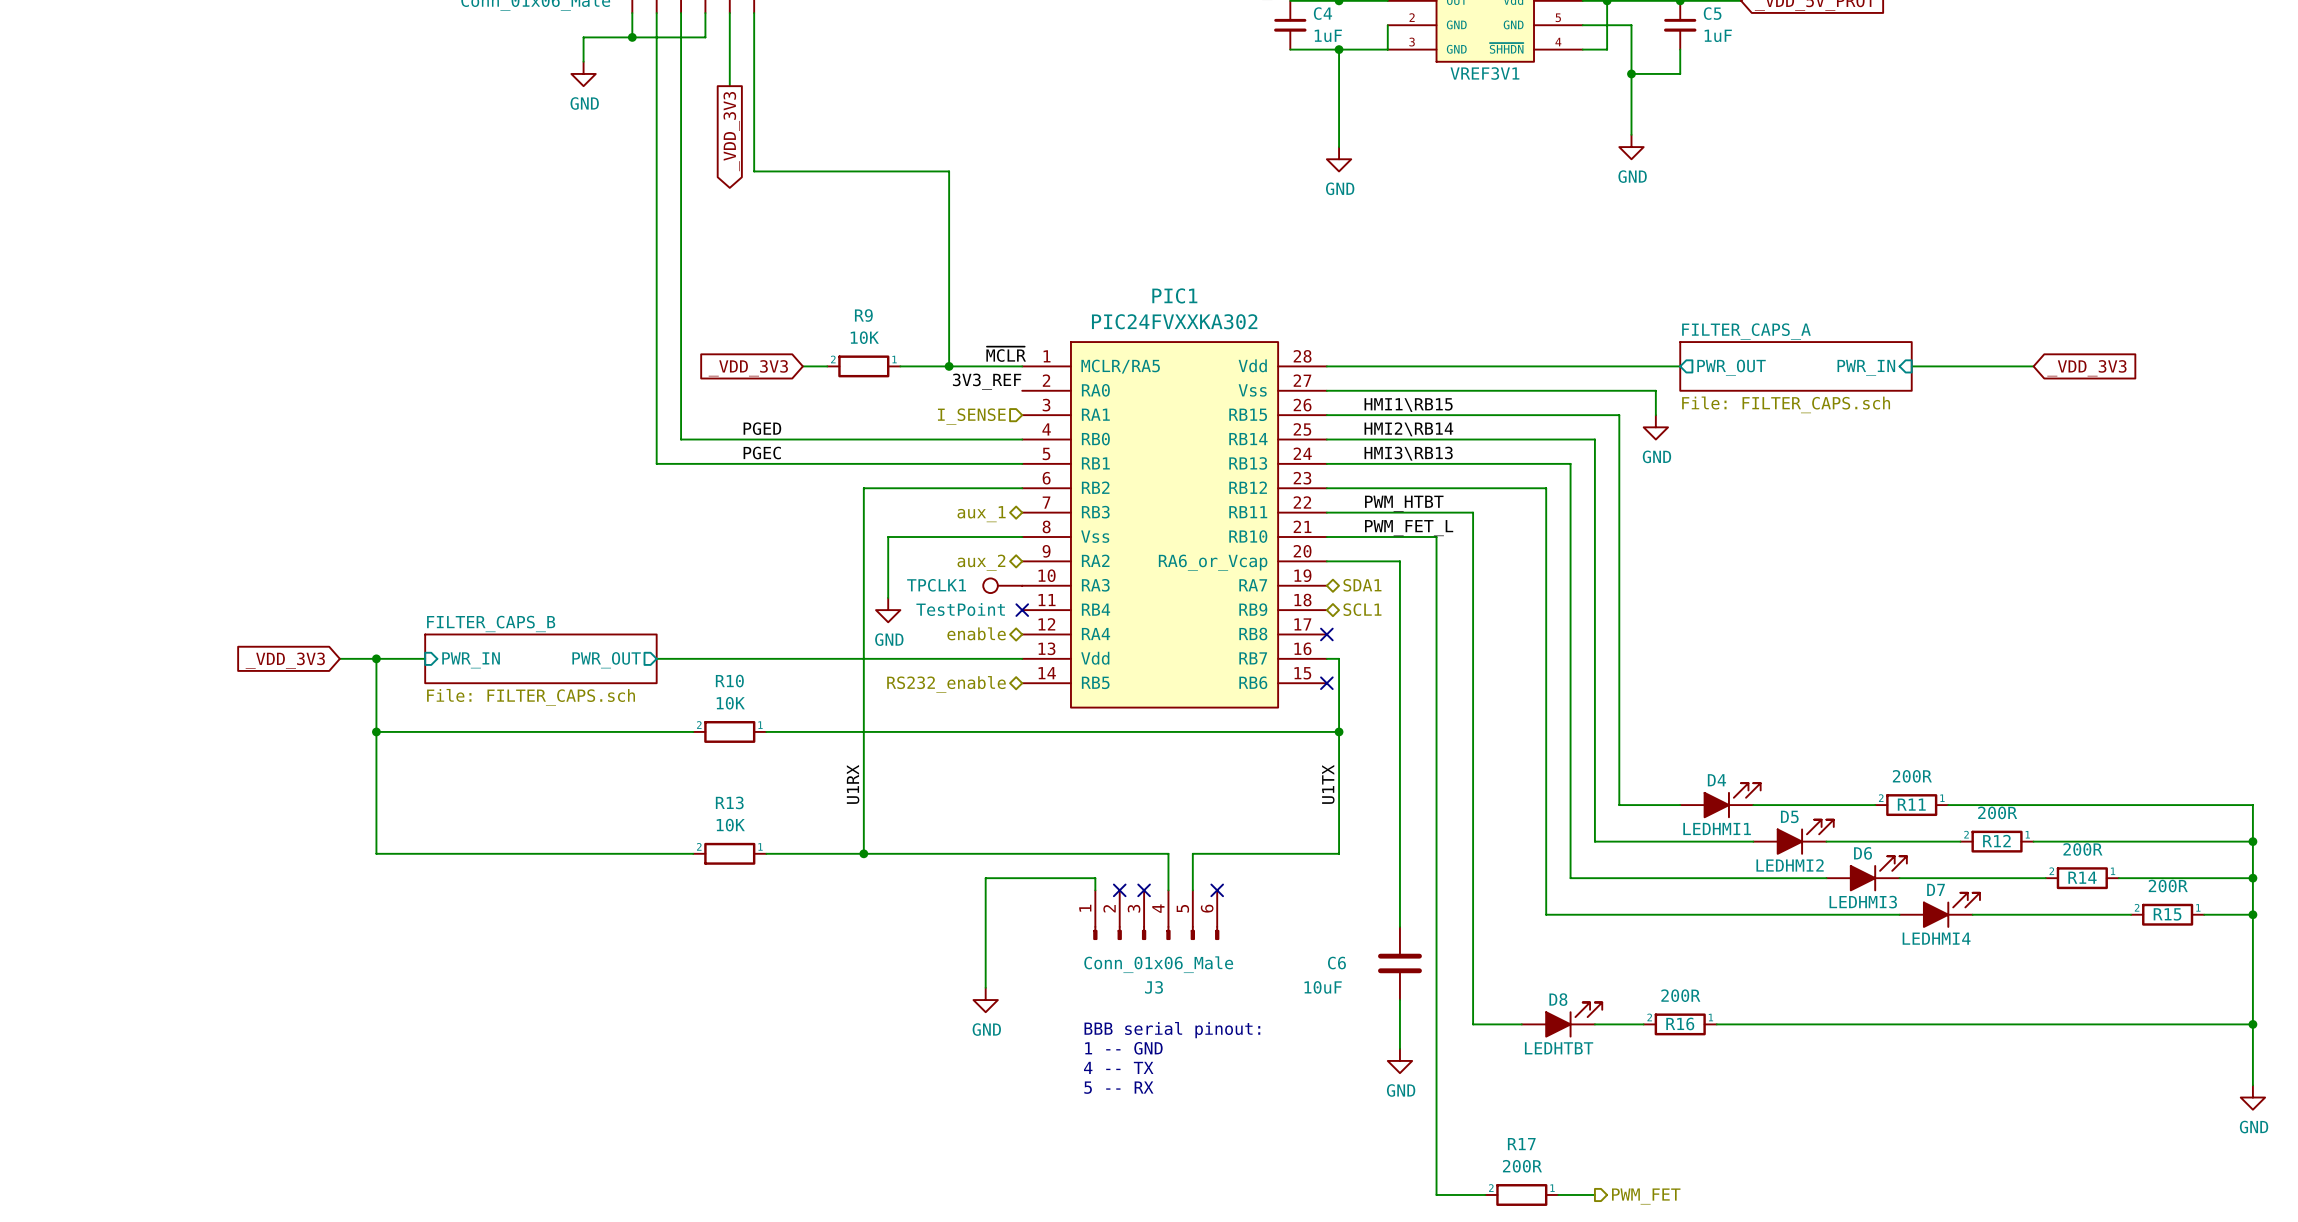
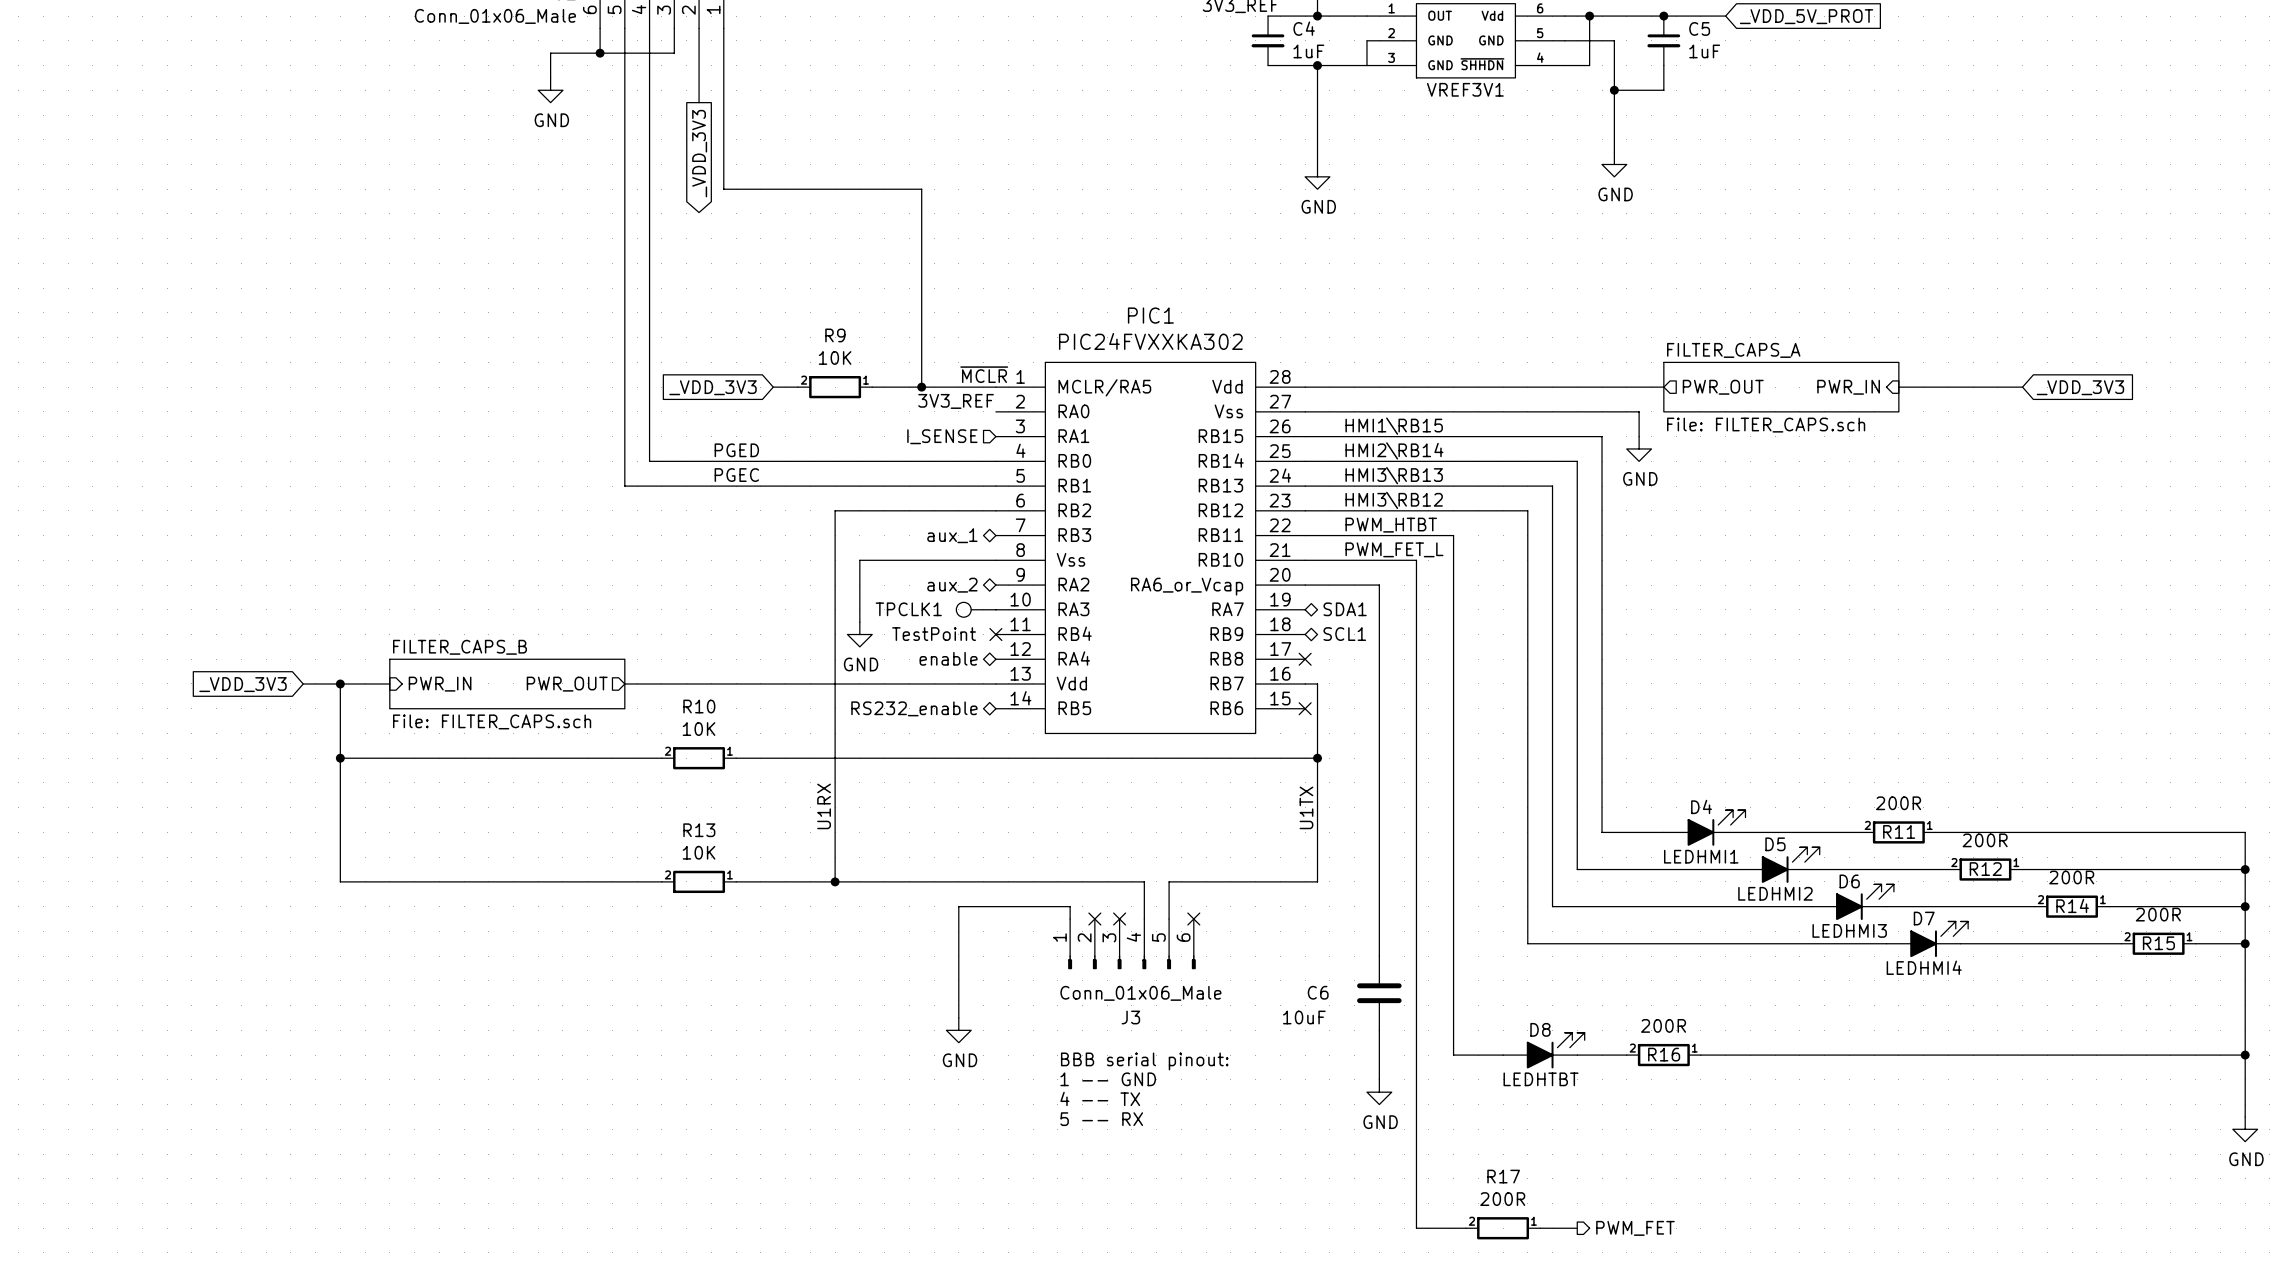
label: none -> HMI3\RB12 (1394, 500)

